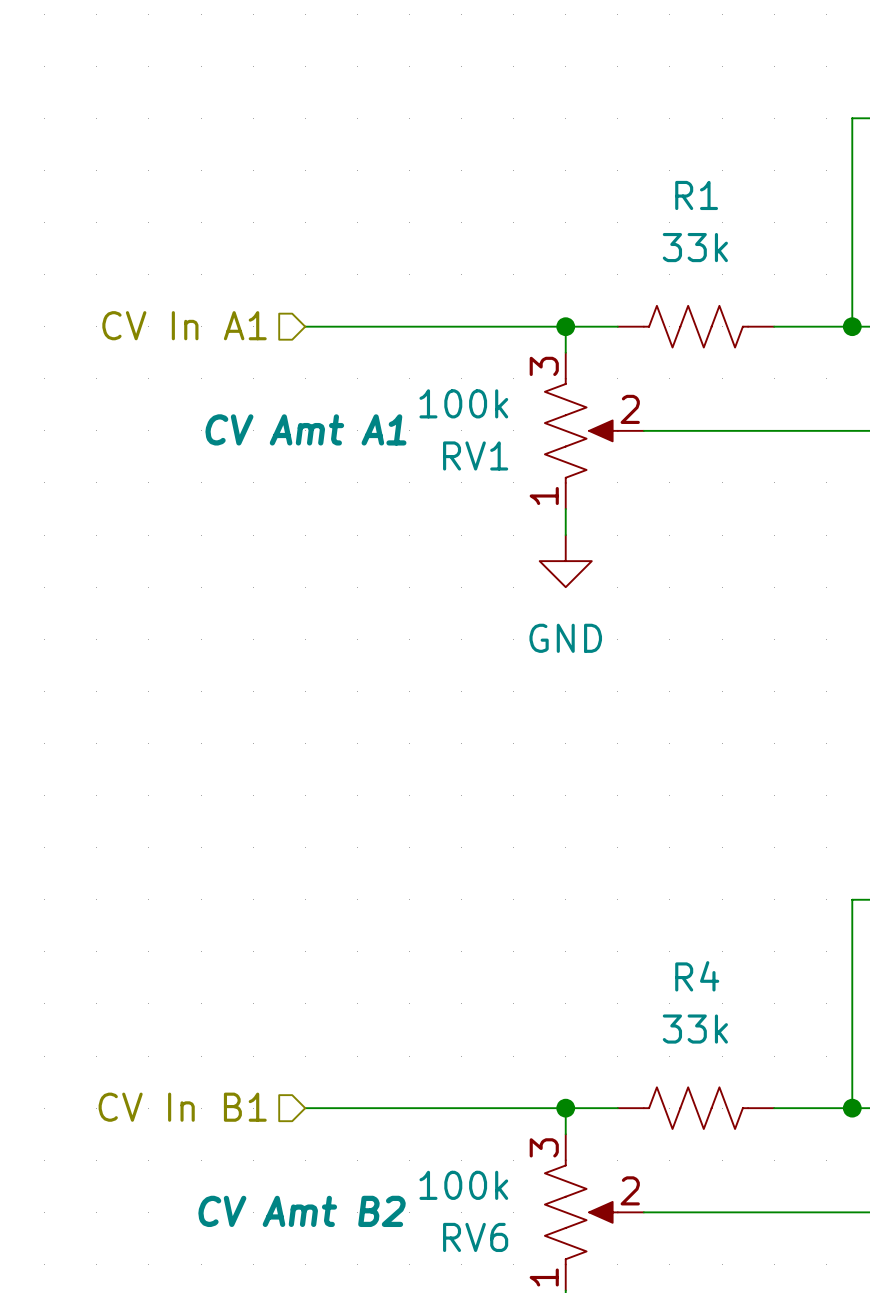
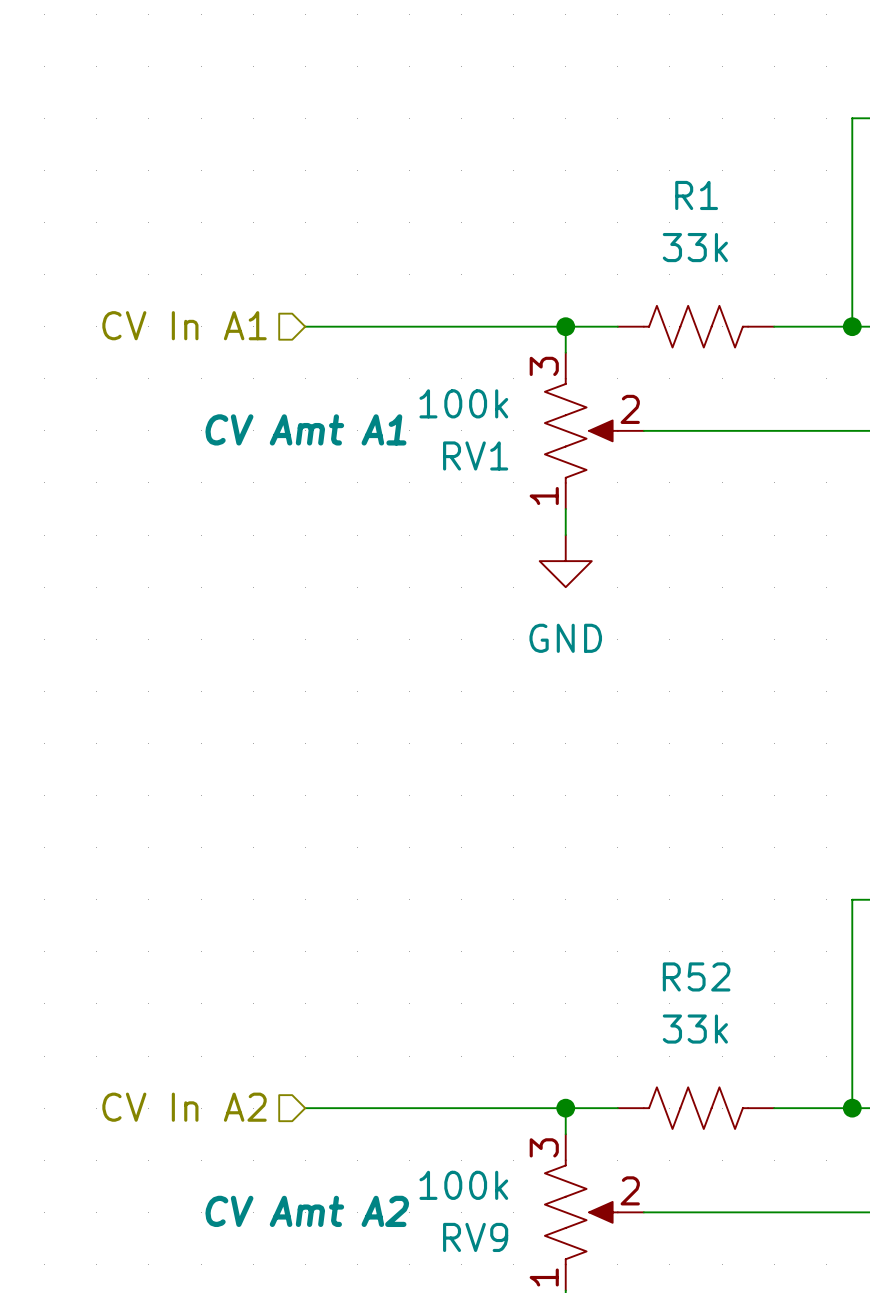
R4 name: R4 (697, 976) -> R52 (696, 976)
hierarchical label: CV In B1 (182, 1107) -> CV In A2 (184, 1107)
RV6 text: CV Amt B2 (302, 1211) -> CV Amt A2 (307, 1211)
RV6 name: RV6 (475, 1237) -> RV9 (475, 1237)

